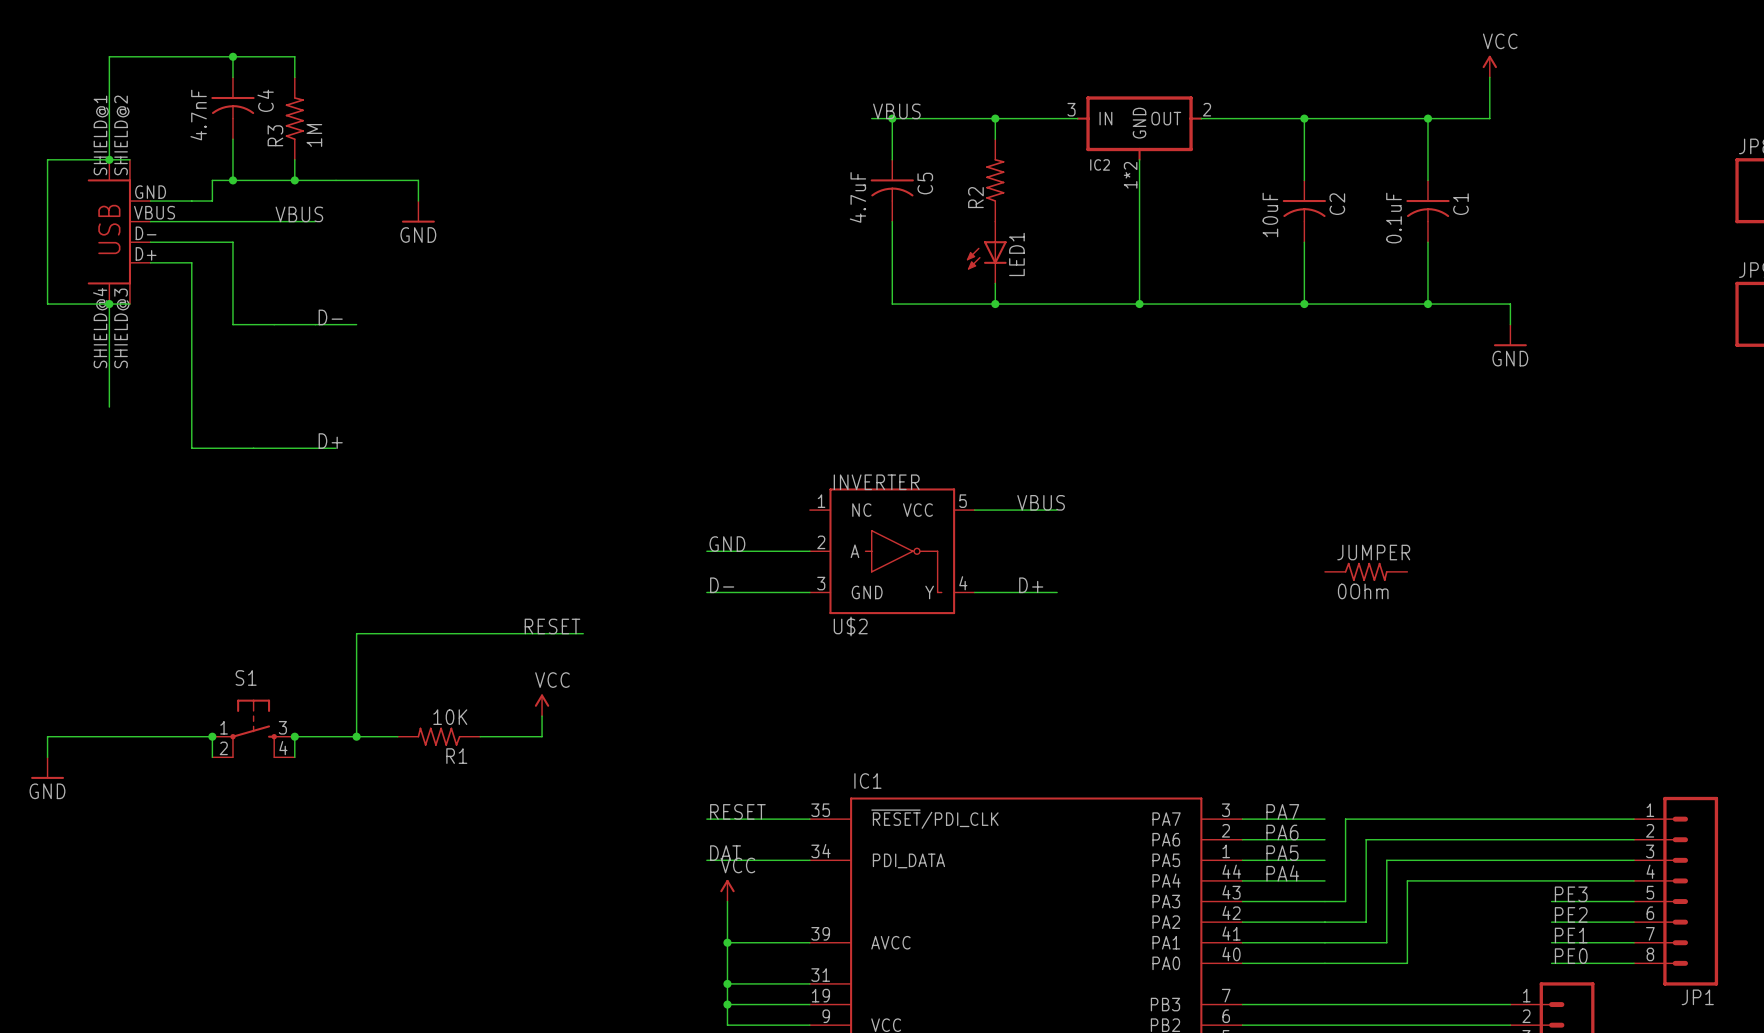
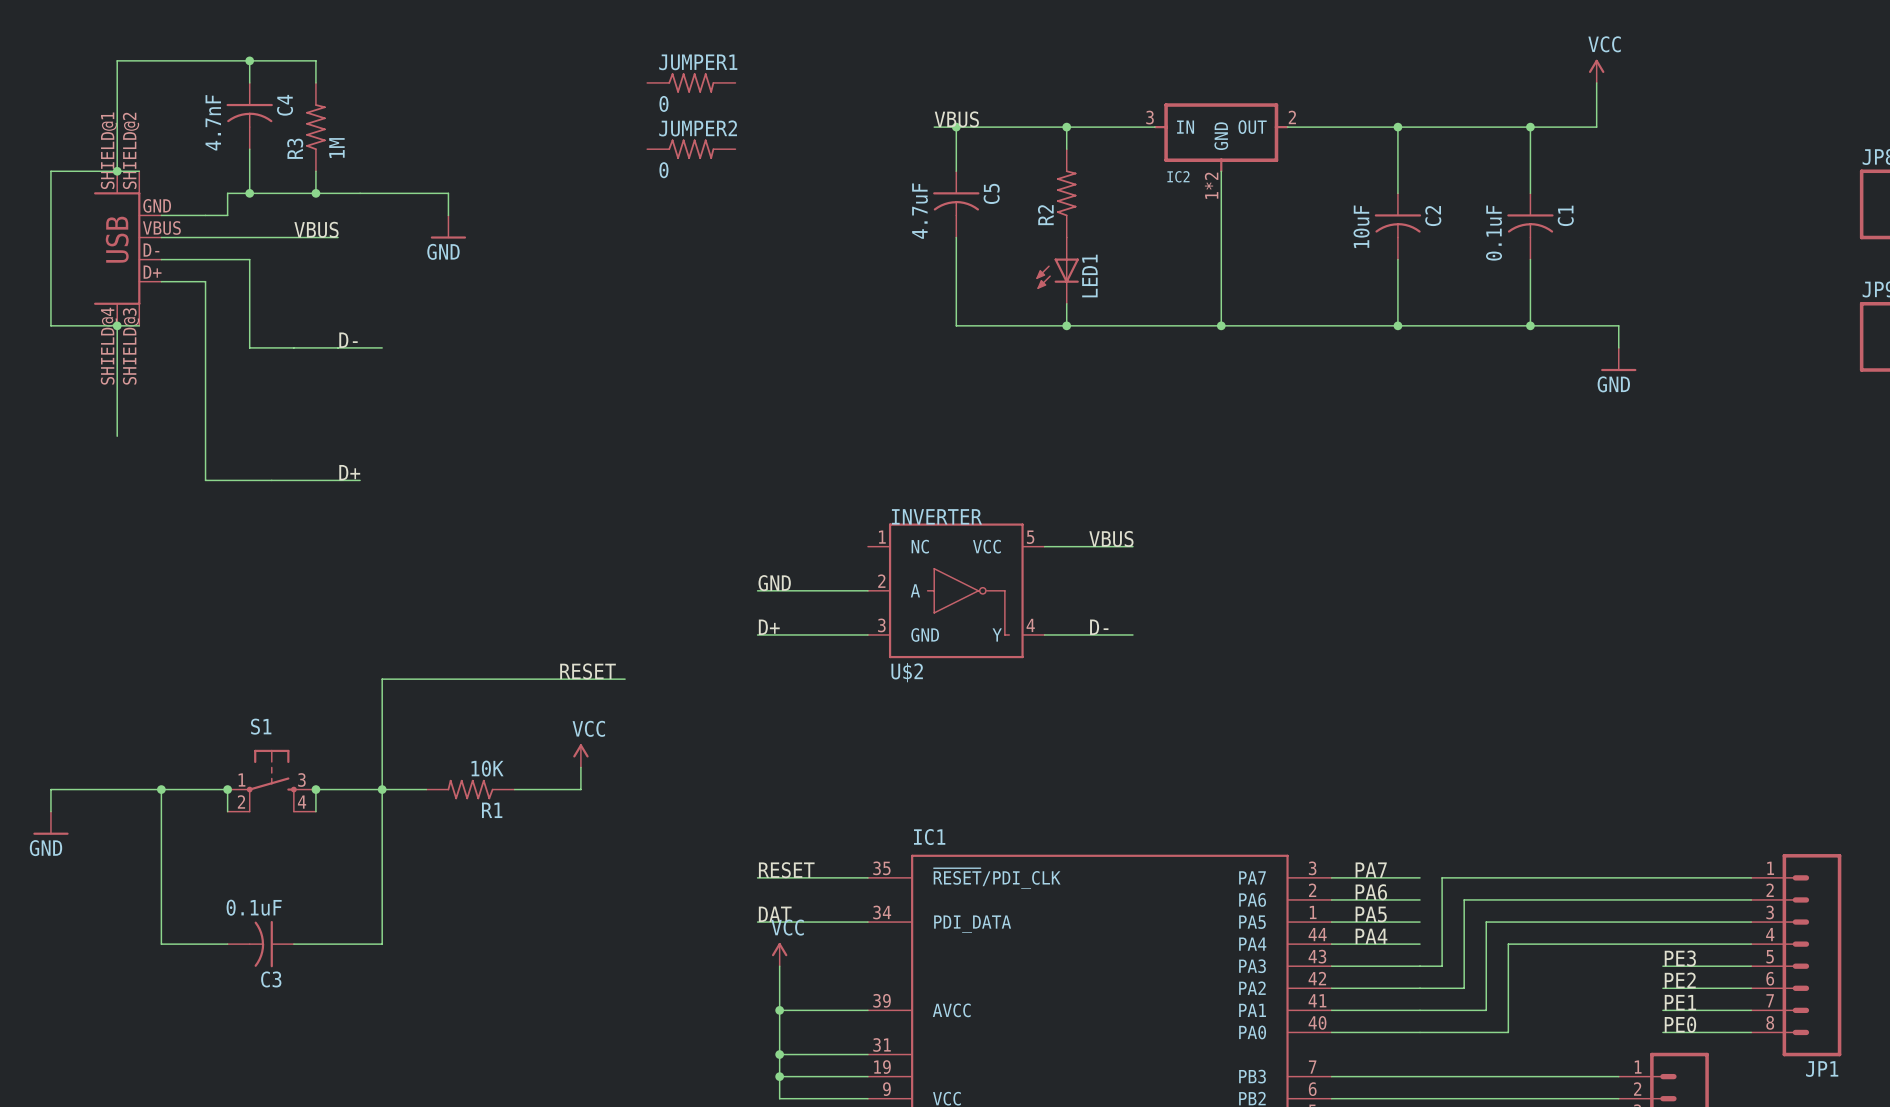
JUMPER1: none -> 0 (691, 82)
JUMPER2: none -> 0 (691, 149)
JUMPER: 0Ohm (1366, 571) -> none
label: D- (722, 585) -> D+ (769, 627)
label: D+ (1031, 585) -> D- (1099, 627)
wire: none -> (161, 789) (161, 944) (227, 944)
junction: none -> (161, 789)
wire: none -> (382, 789) (382, 944) (293, 944)
C3: none -> 0.1uF (260, 944)

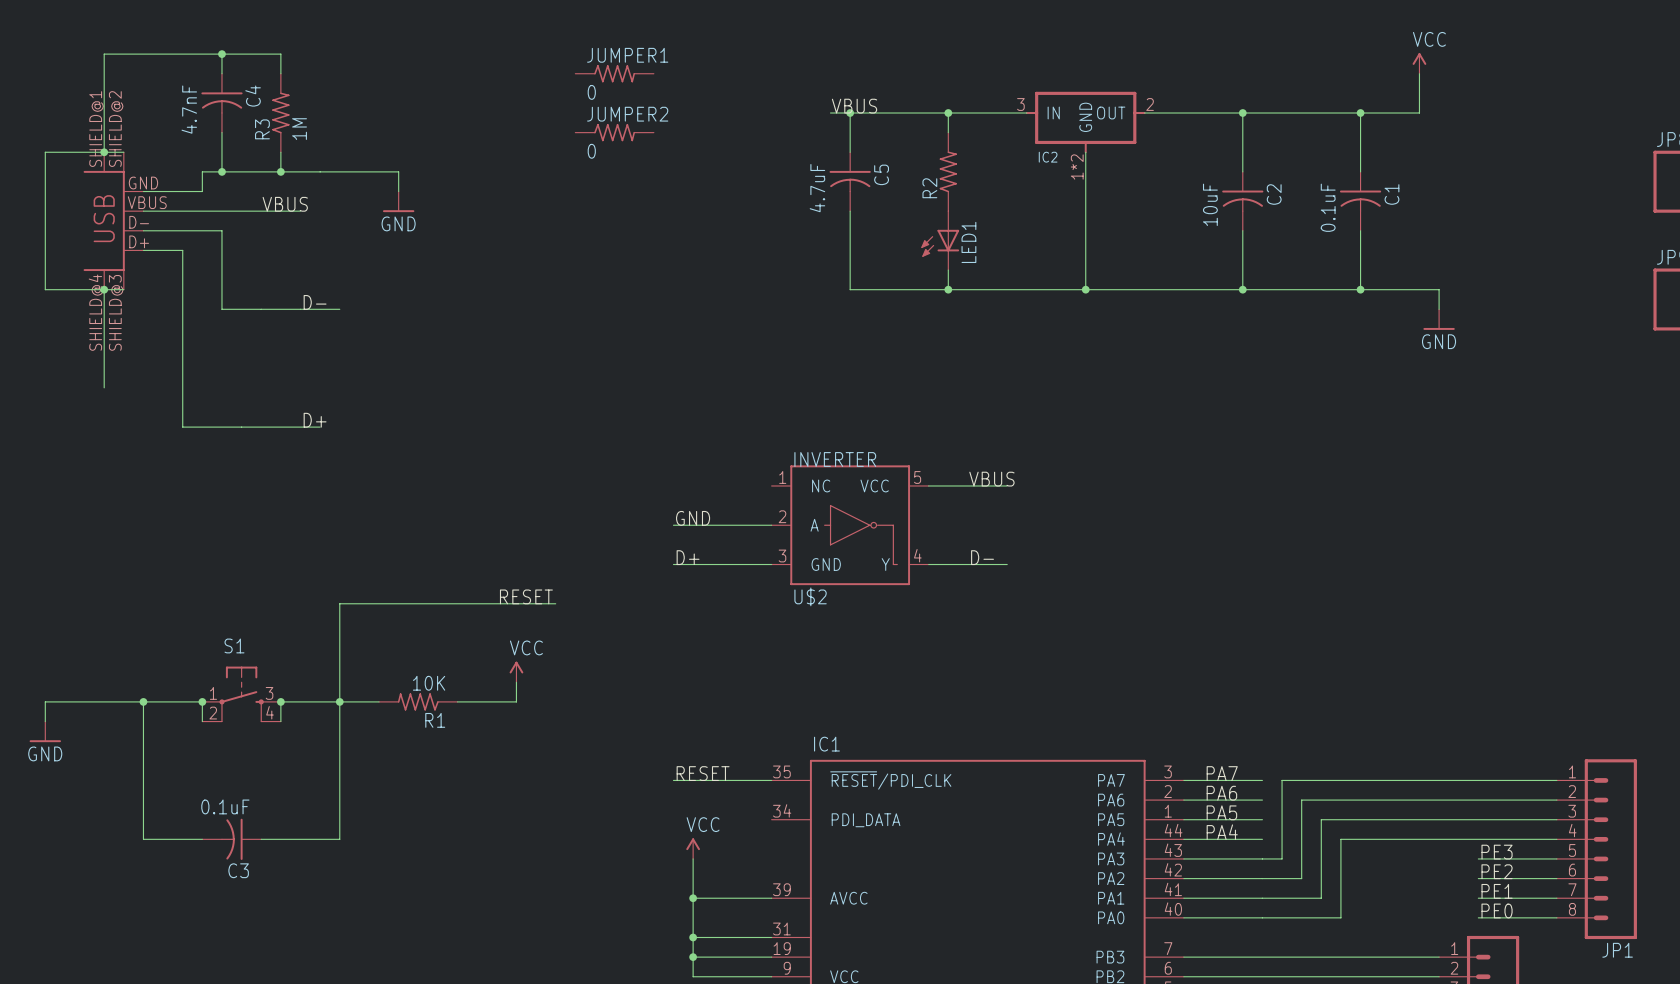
label: DAT (775, 914) -> none
wire: (757, 922) (867, 922) -> none

